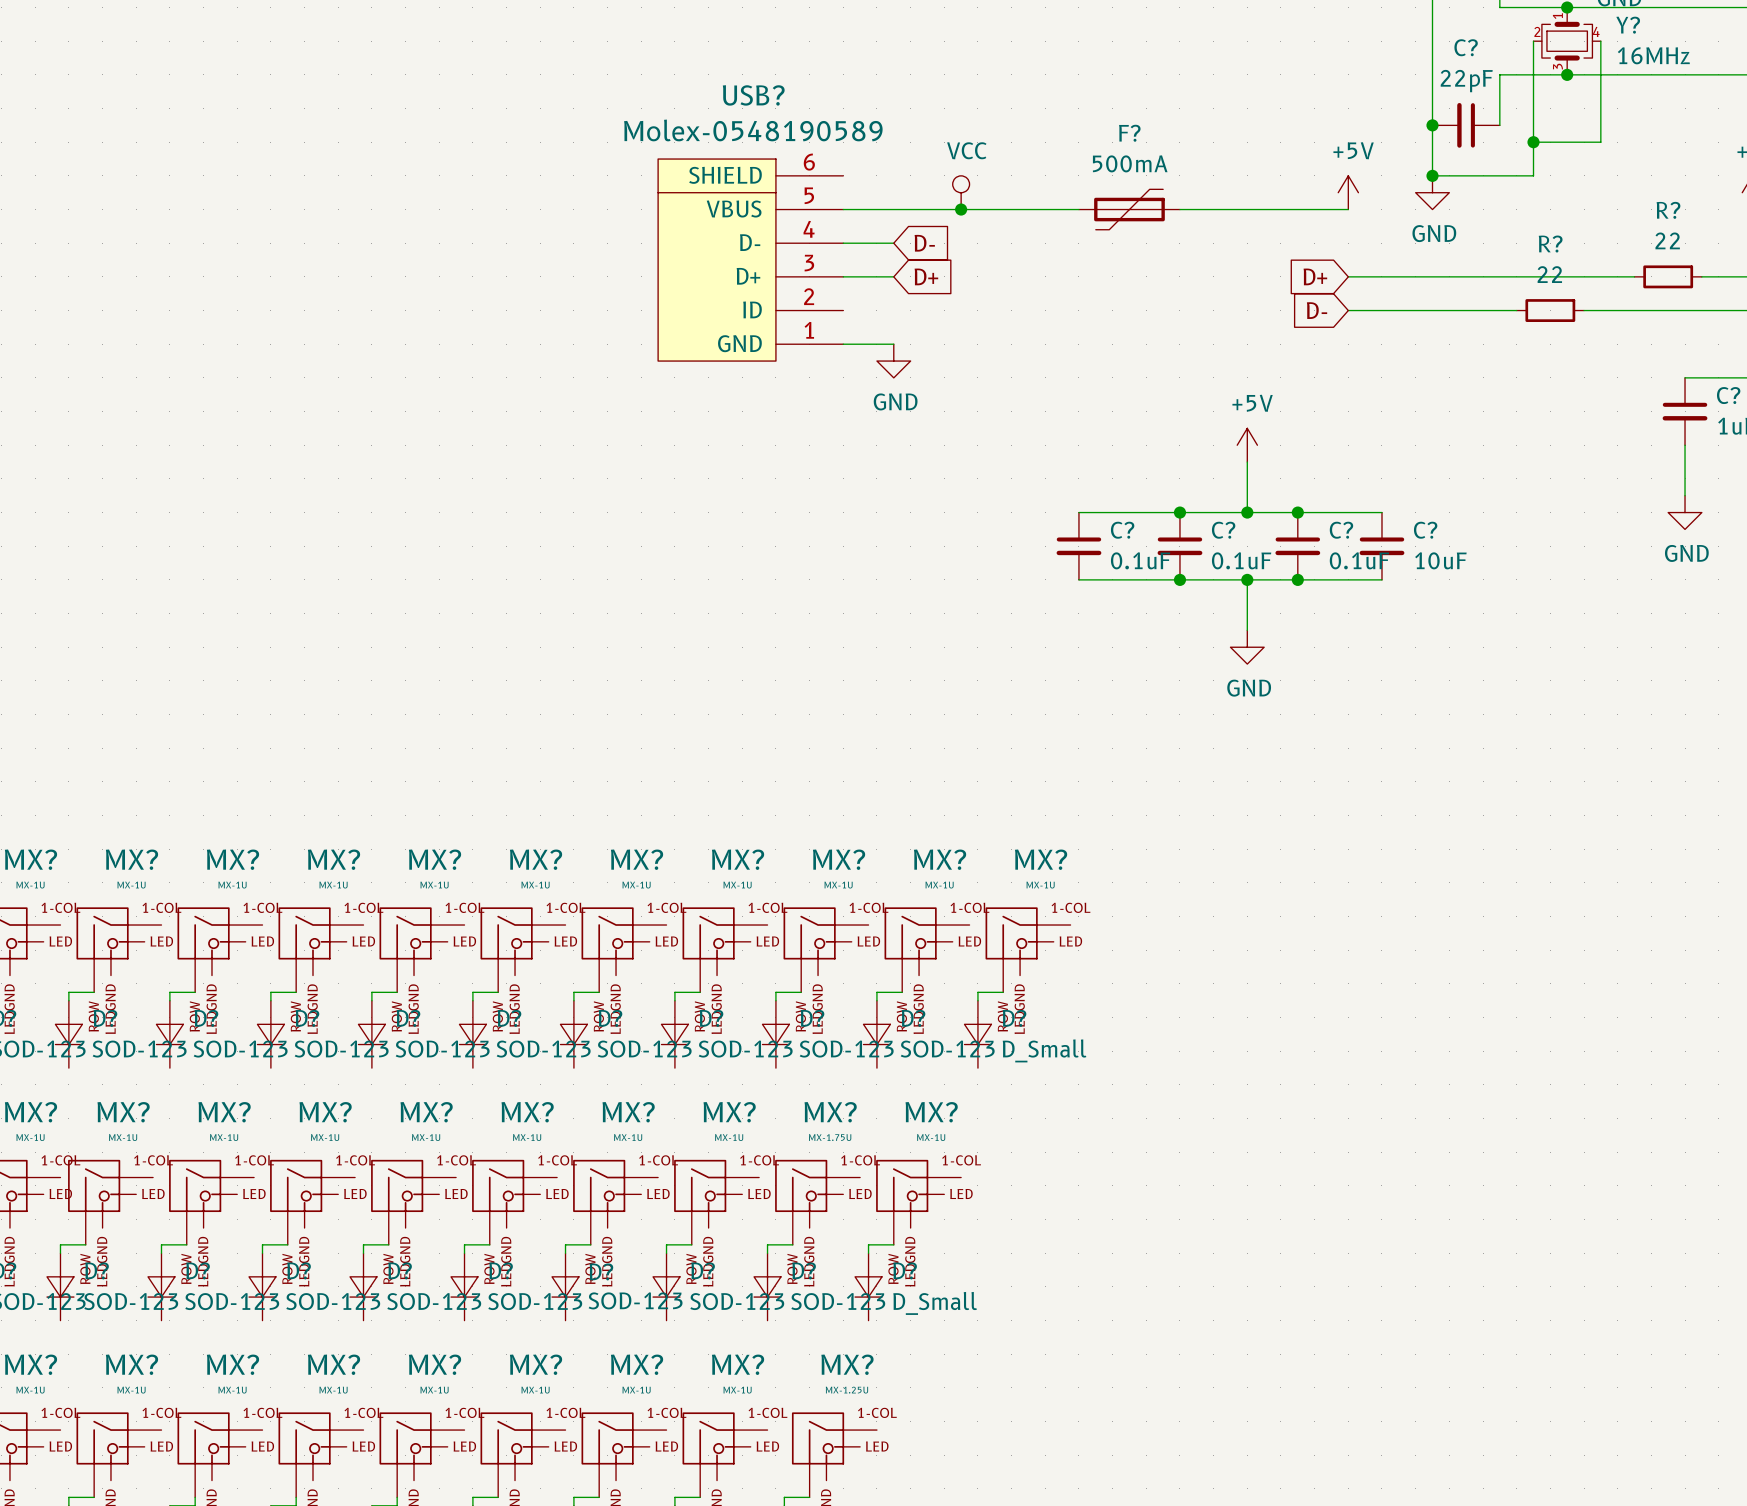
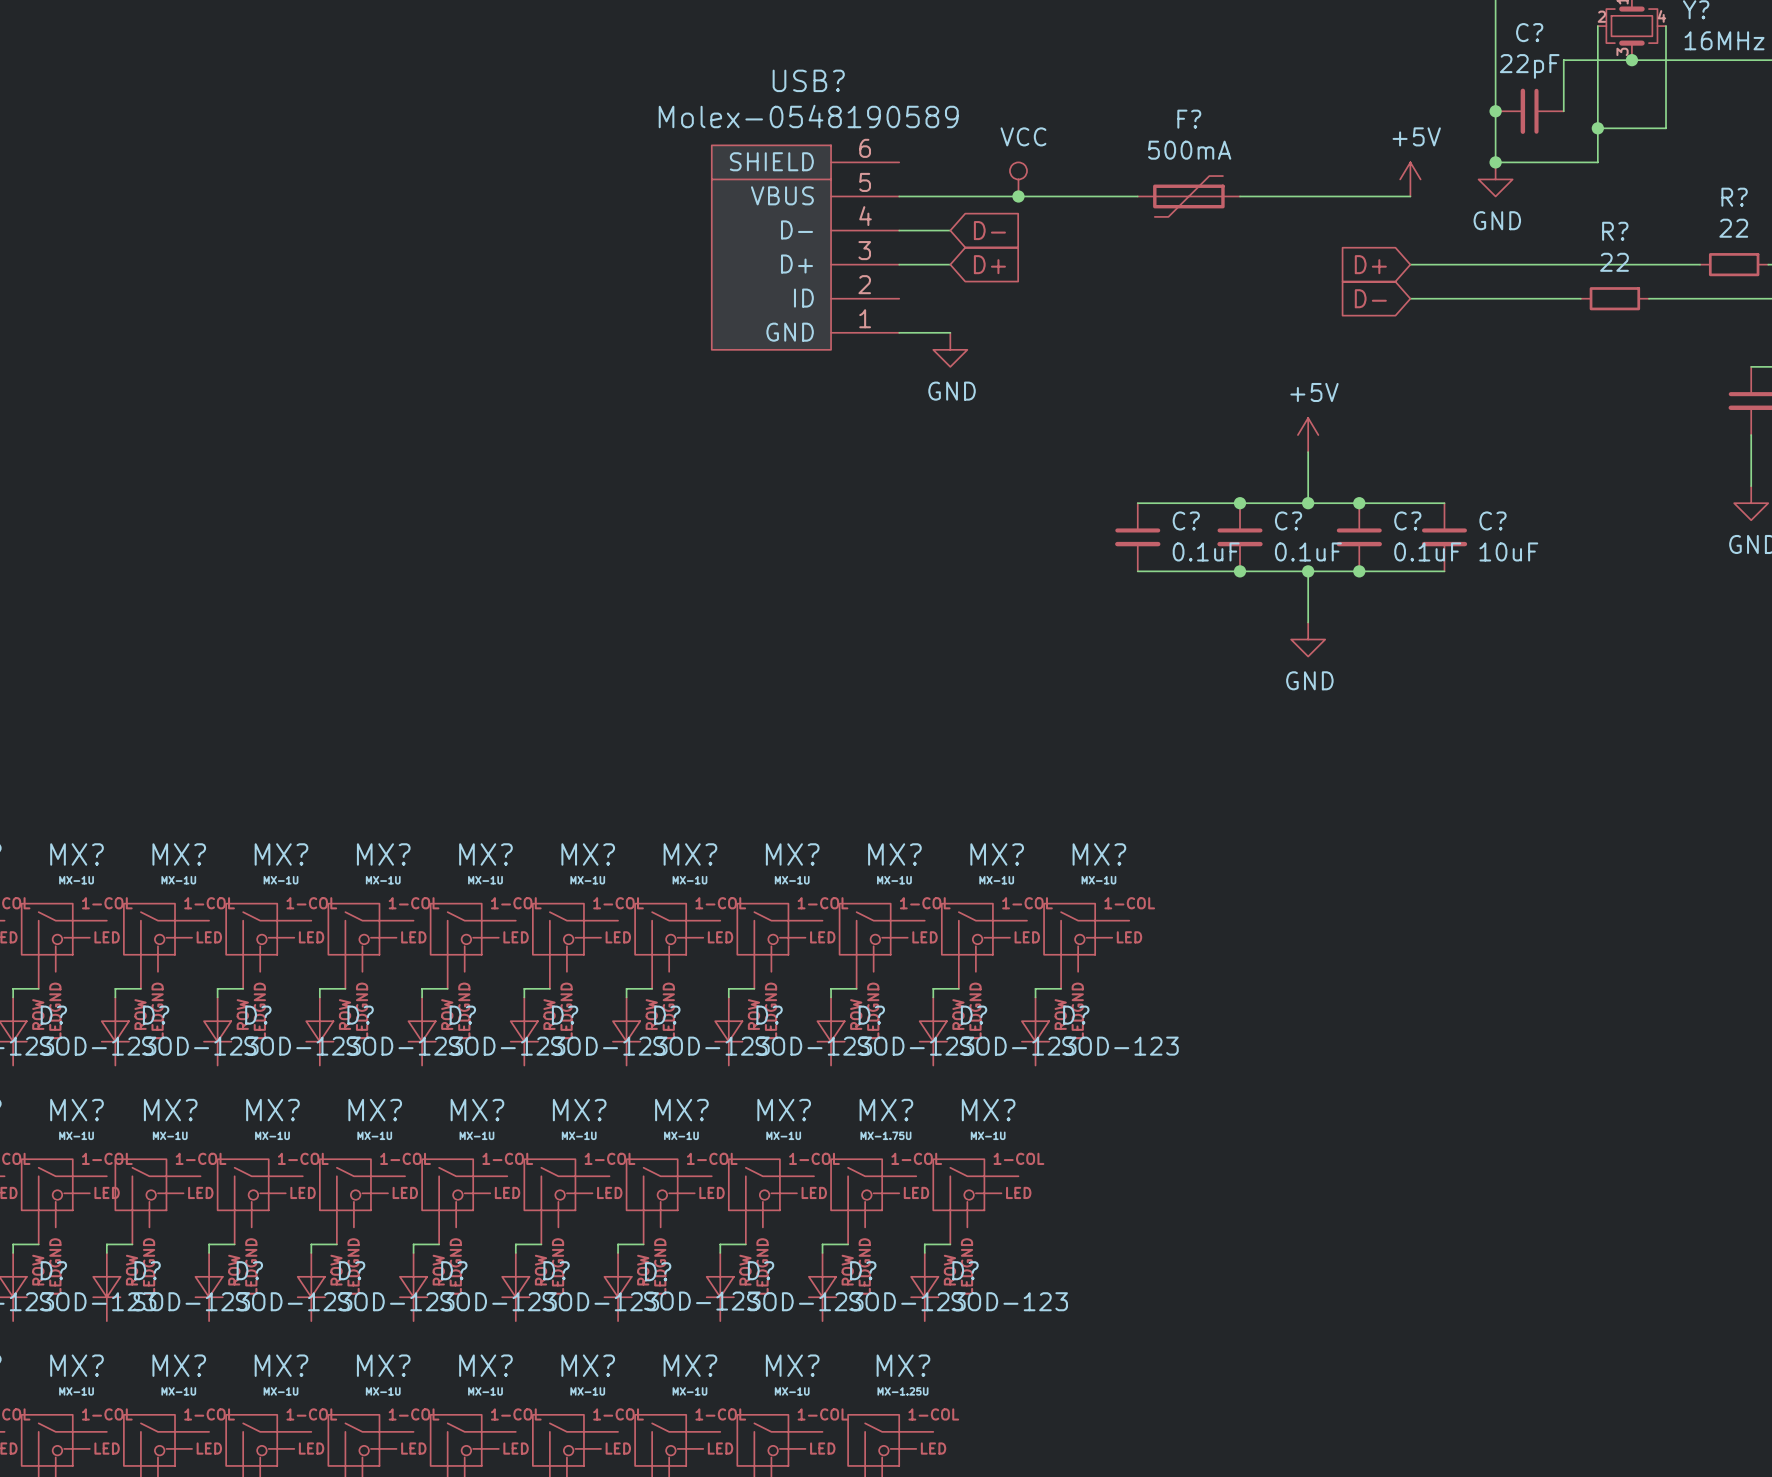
D? value: D_Small (1044, 1050) -> SOD-123 (1120, 1046)
D? value: D_Small (935, 1303) -> SOD-123 (1009, 1301)

